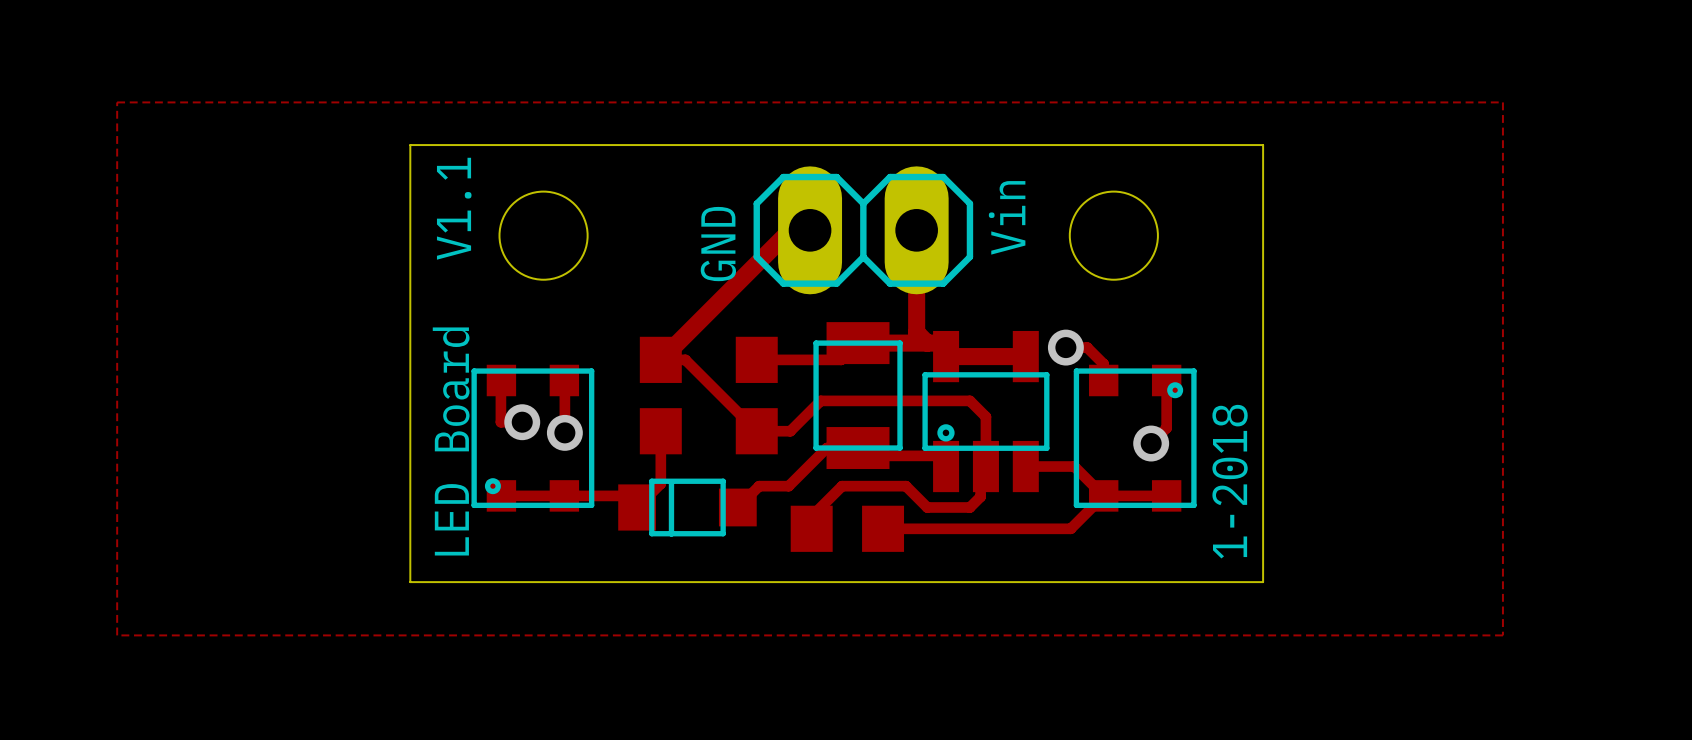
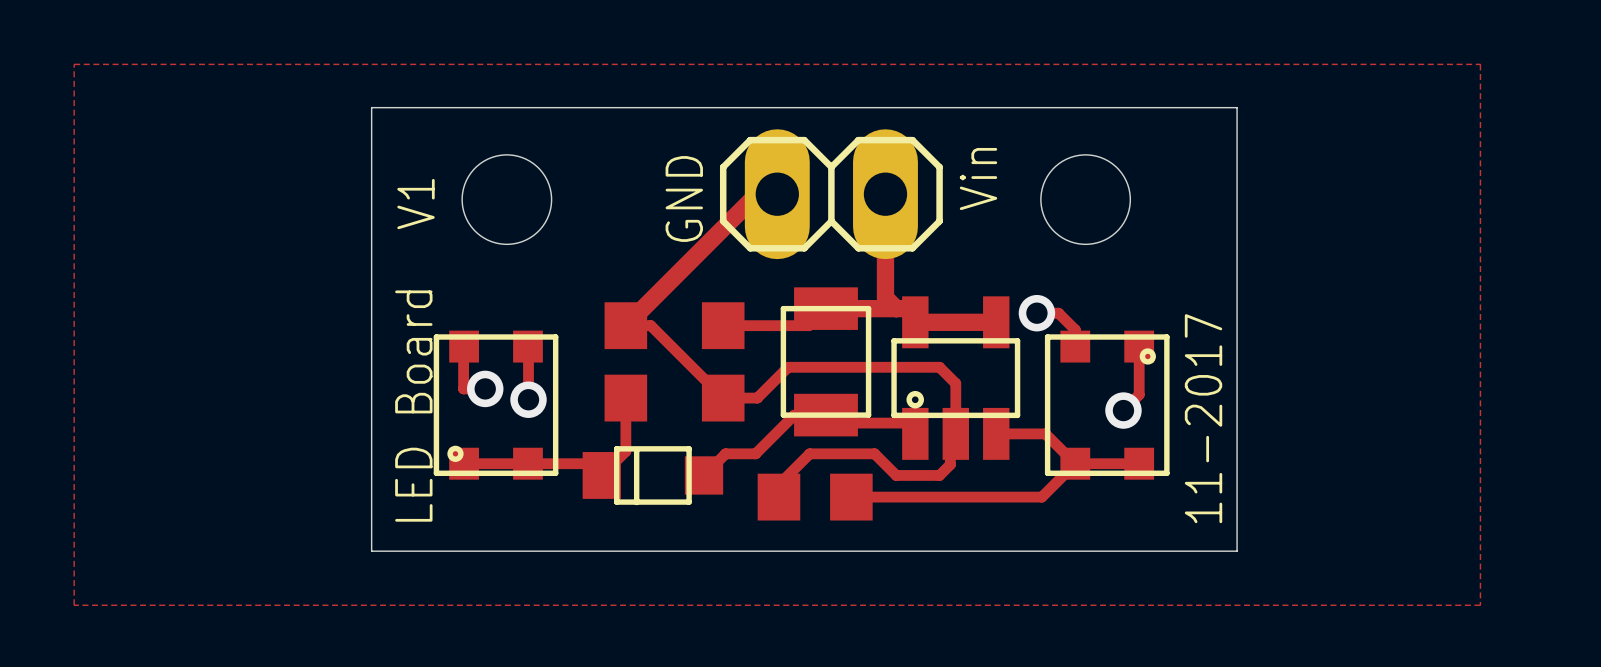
text: V1.1 (454, 208) -> V1 (416, 204)
text: 1-2018 (1230, 481) -> 11-2017 (1203, 418)

